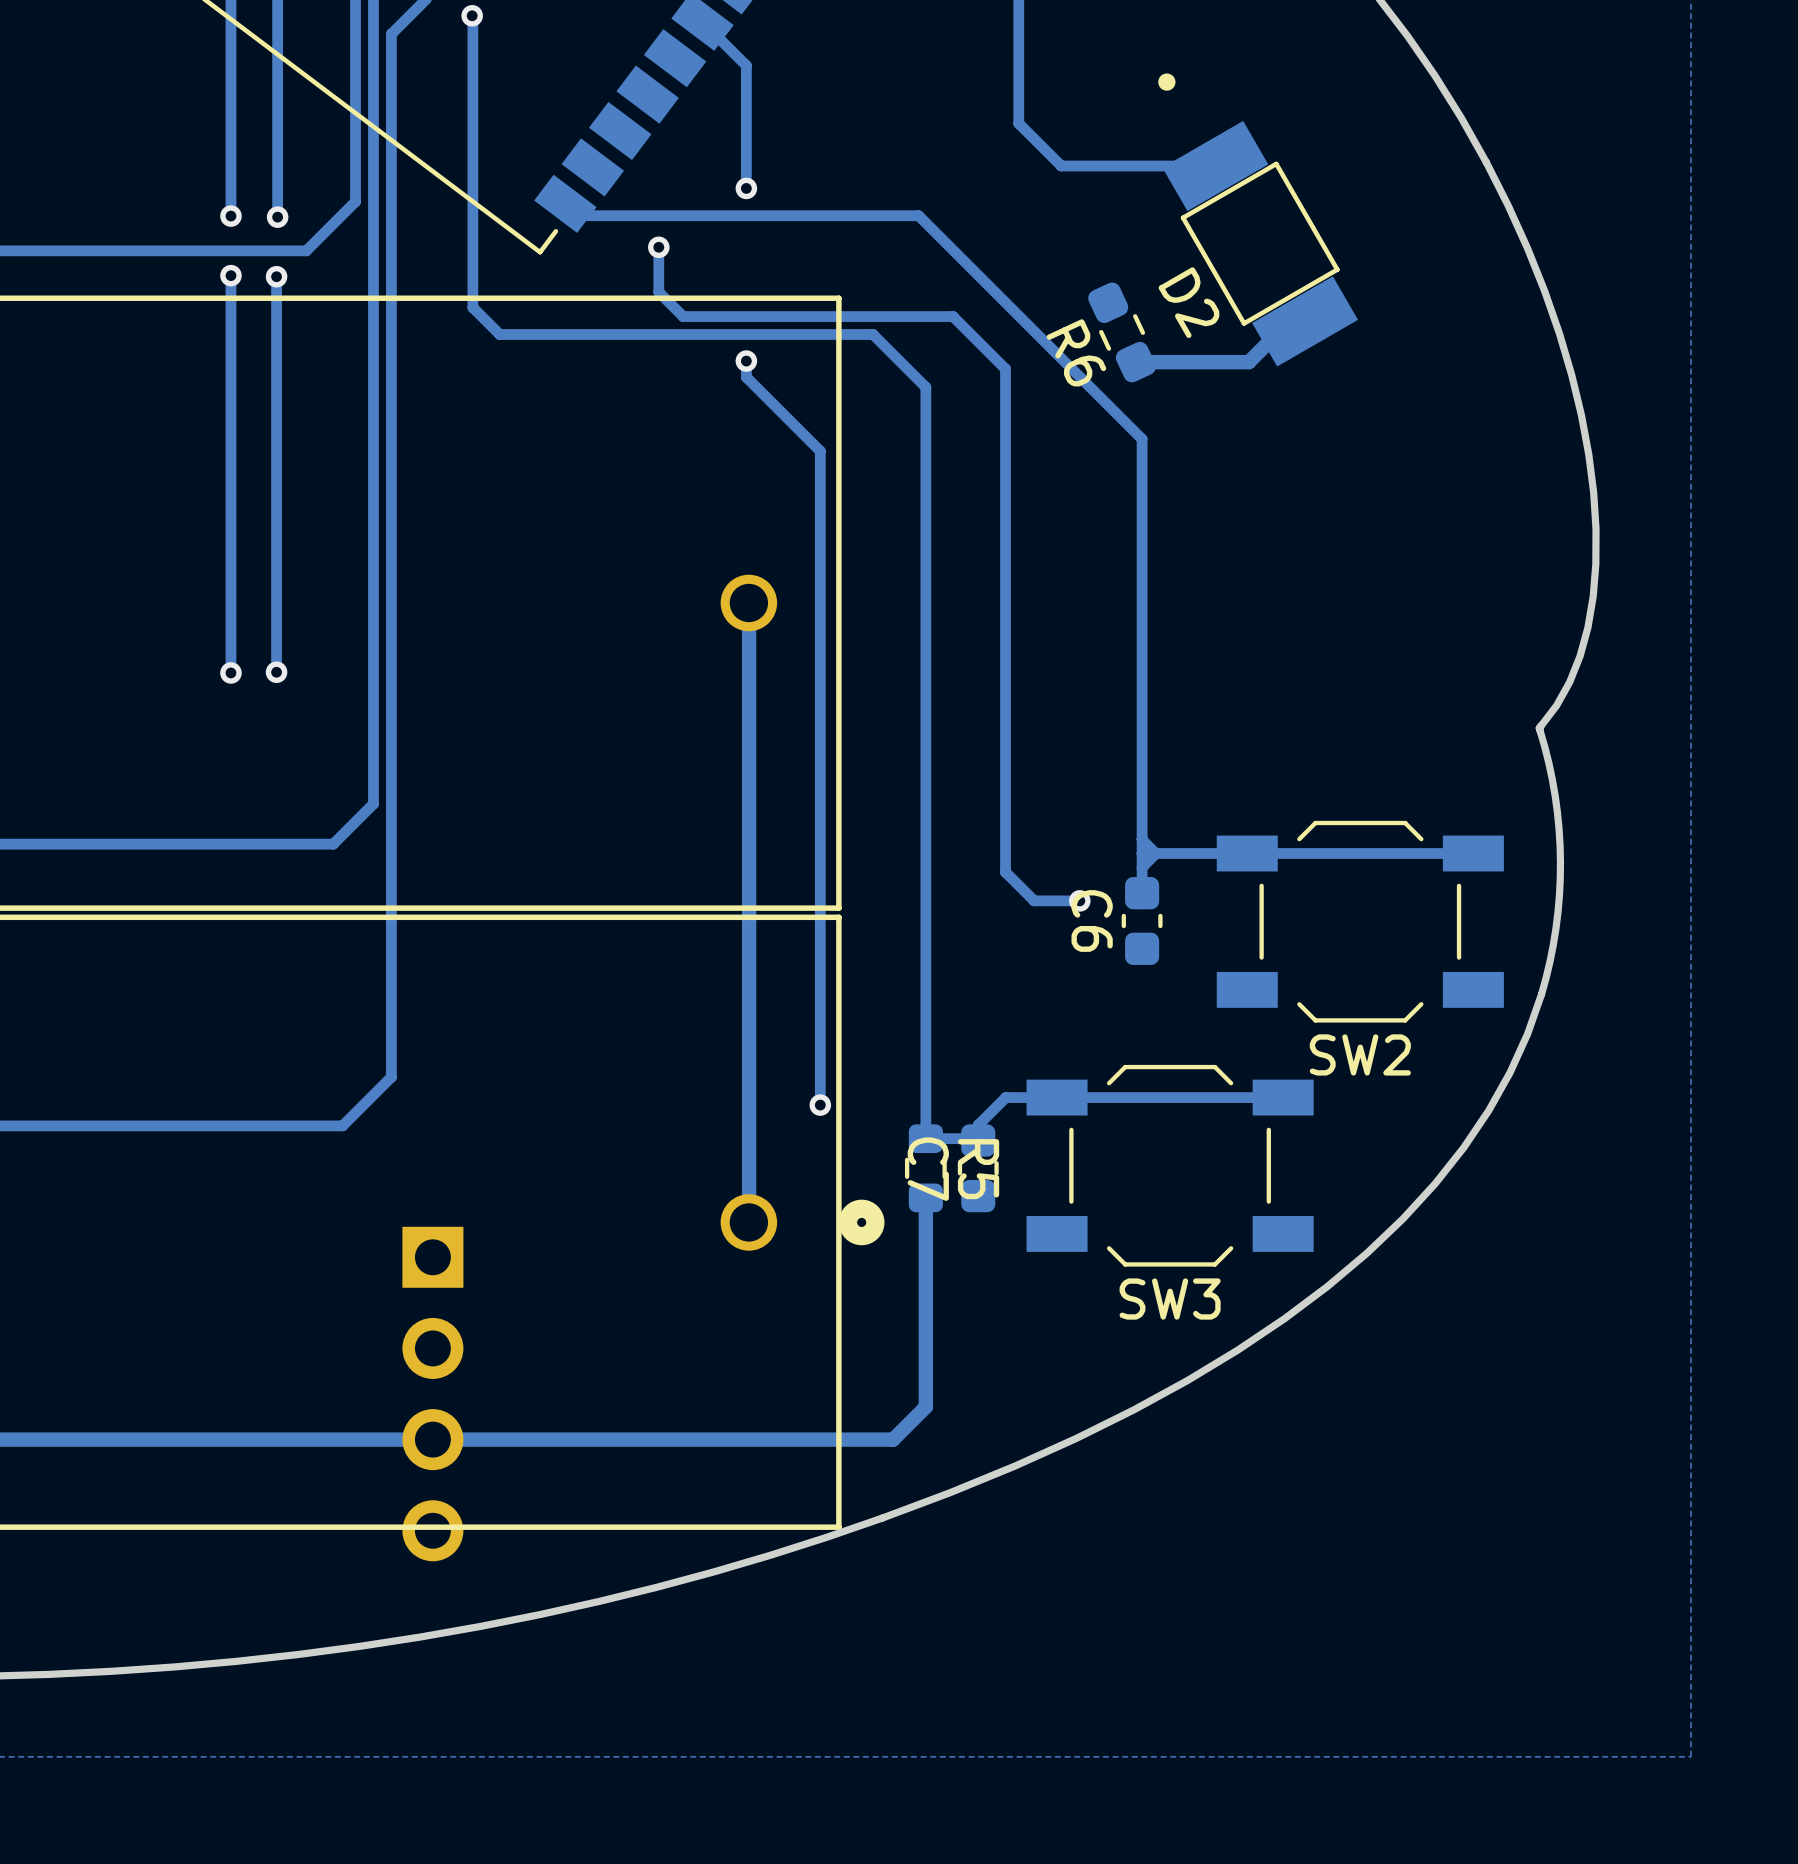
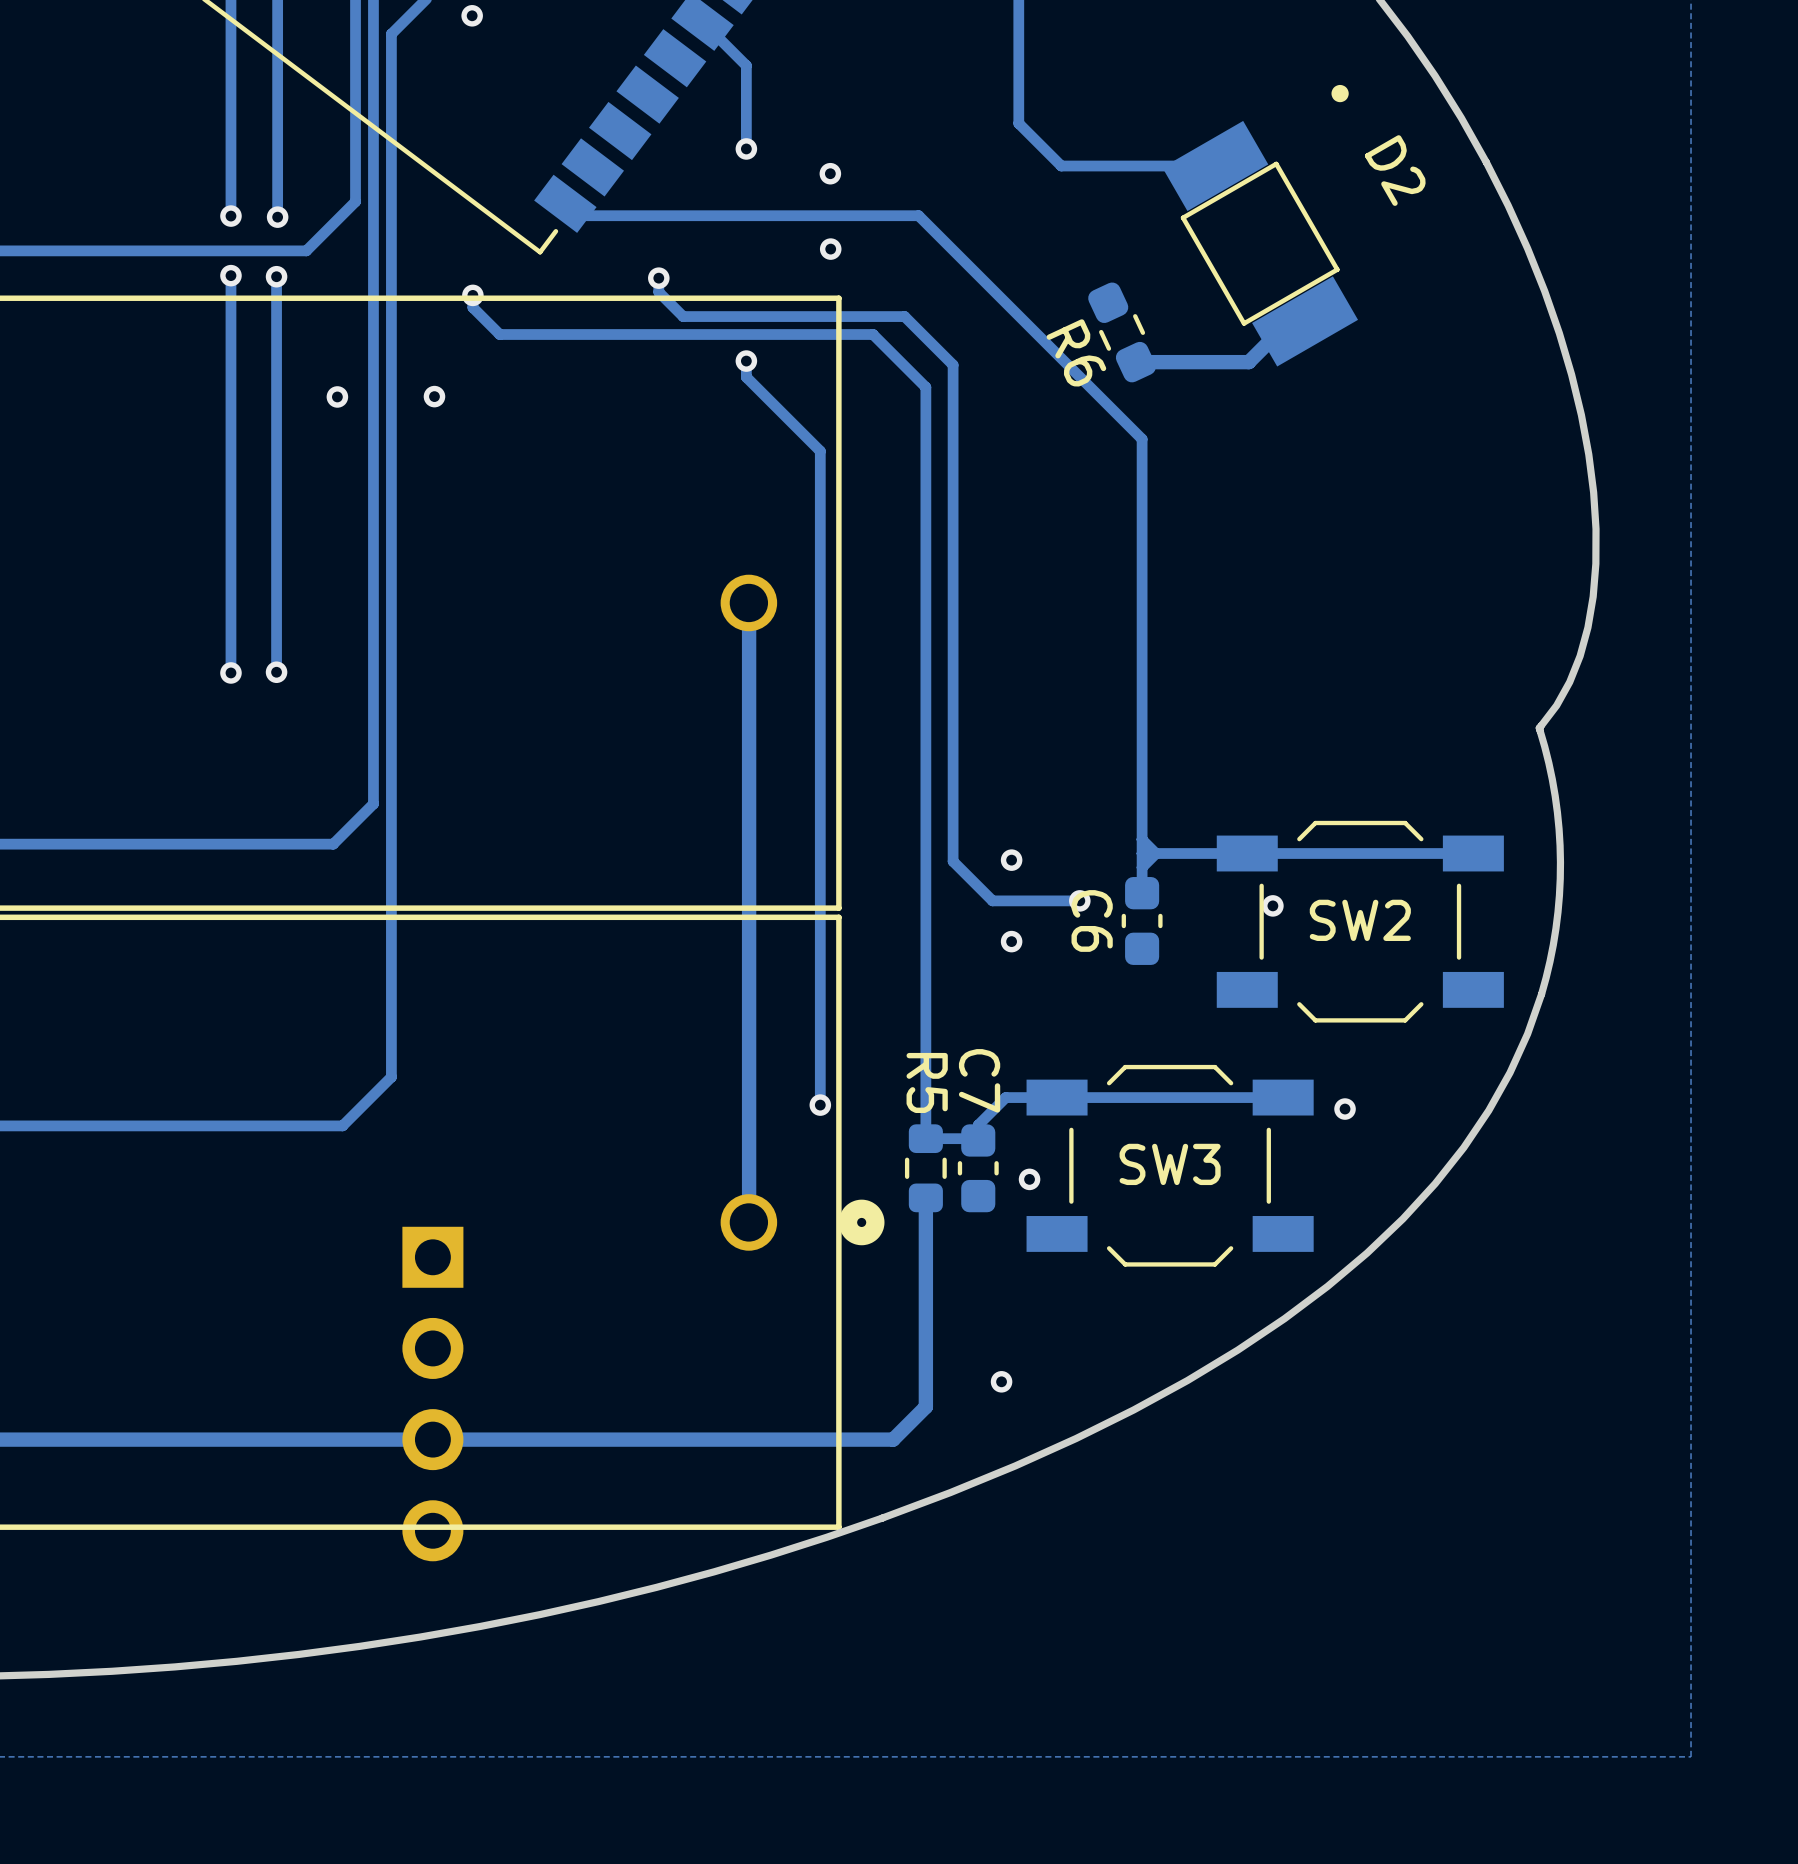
track: (472, 16) (472, 295) -> none
D2 footprint: [1158, 73, 1359, 367] -> [1162, 84, 1359, 367]
track: (746, 148) (746, 188) -> none
via: none -> (830, 173)
via position: (746, 188) -> (746, 148)
track: (658, 247) (658, 278) -> none
via position: (658, 247) -> (658, 278)
via: none -> (830, 249)
via: none -> (472, 295)
D2 name position: D2 (1189, 302) -> D2 (1395, 170)
track: (904, 316) (953, 316) (1005, 368) (1005, 872) (1034, 900) -> (904, 316) (953, 365) (953, 861) (992, 900) (1034, 900)
via: none -> (337, 396)
via: none -> (434, 396)
via: none -> (1011, 860)
via: none -> (1272, 905)
via: none -> (1011, 941)
SW2 name position: SW2 (1360, 1054) -> SW2 (1360, 920)
via: none -> (1345, 1109)
C7 name position: C7 (928, 1169) -> C7 (979, 1080)
R5 name position: R5 (978, 1169) -> R5 (927, 1082)
via: none -> (1029, 1179)
SW3 name position: SW3 (1170, 1299) -> SW3 (1170, 1164)
via: none -> (1001, 1381)

